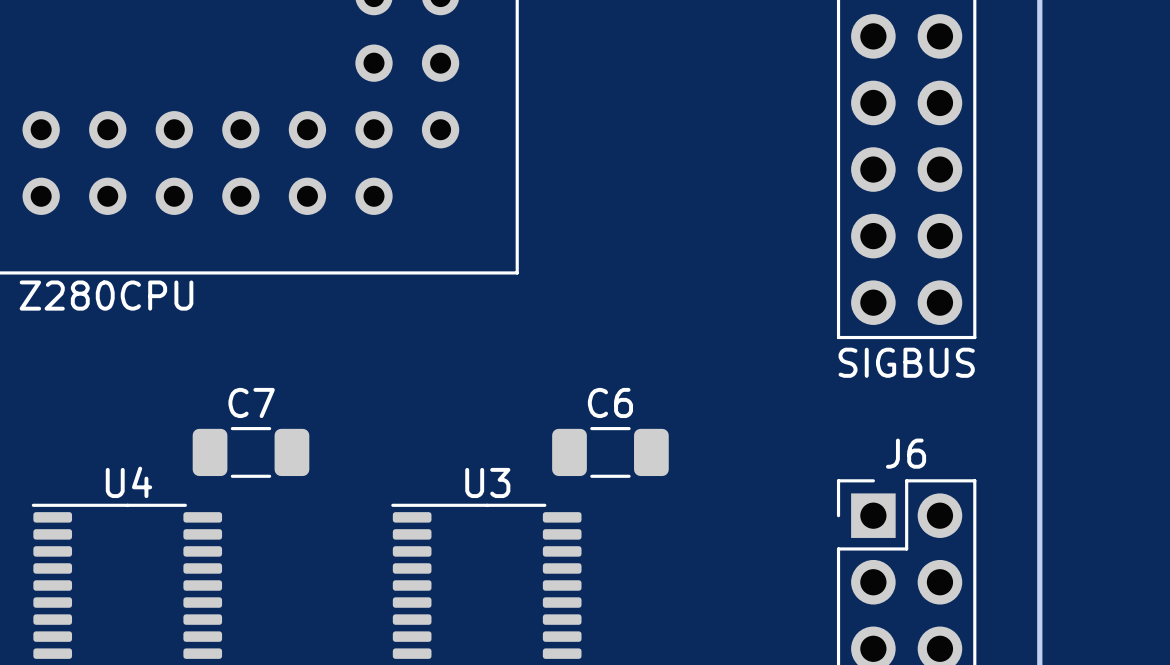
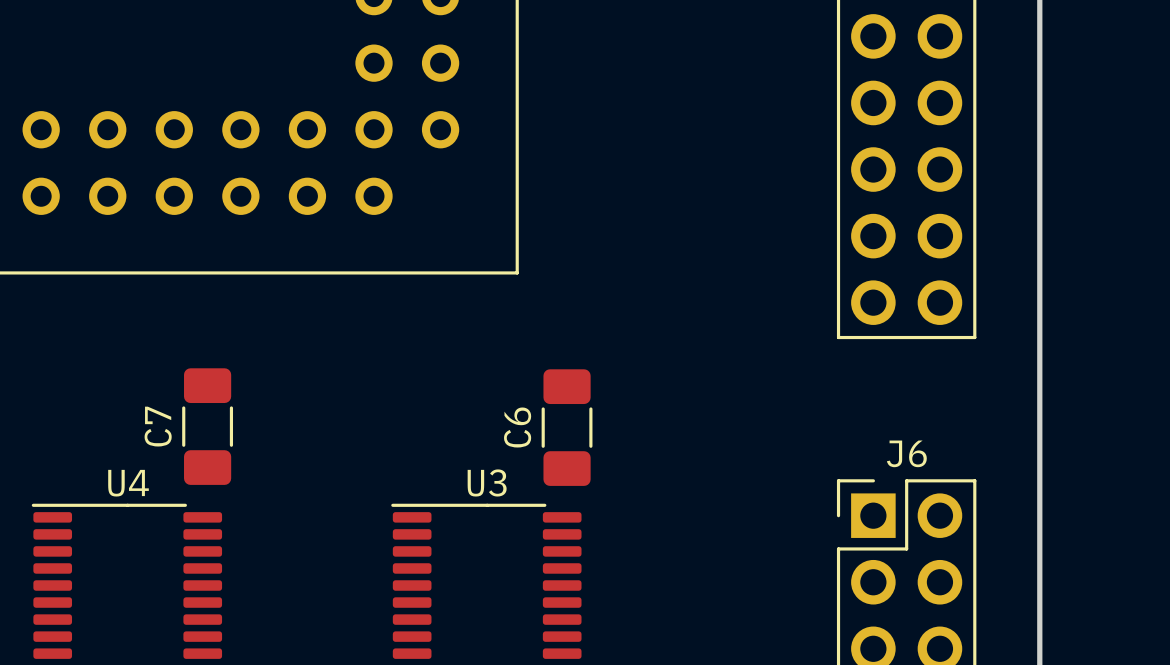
part value: Z280CPU (106, 295) -> none
part value: SIGBUS (906, 362) -> none
C7 name position: C7 (251, 402) -> C7 (158, 426)
C6 name position: C6 (610, 402) -> C6 (517, 427)
C7 rotation: 0° (250, 452) -> 90° clockwise (207, 426)
C6 rotation: 0° (610, 452) -> 90° clockwise (567, 427)

